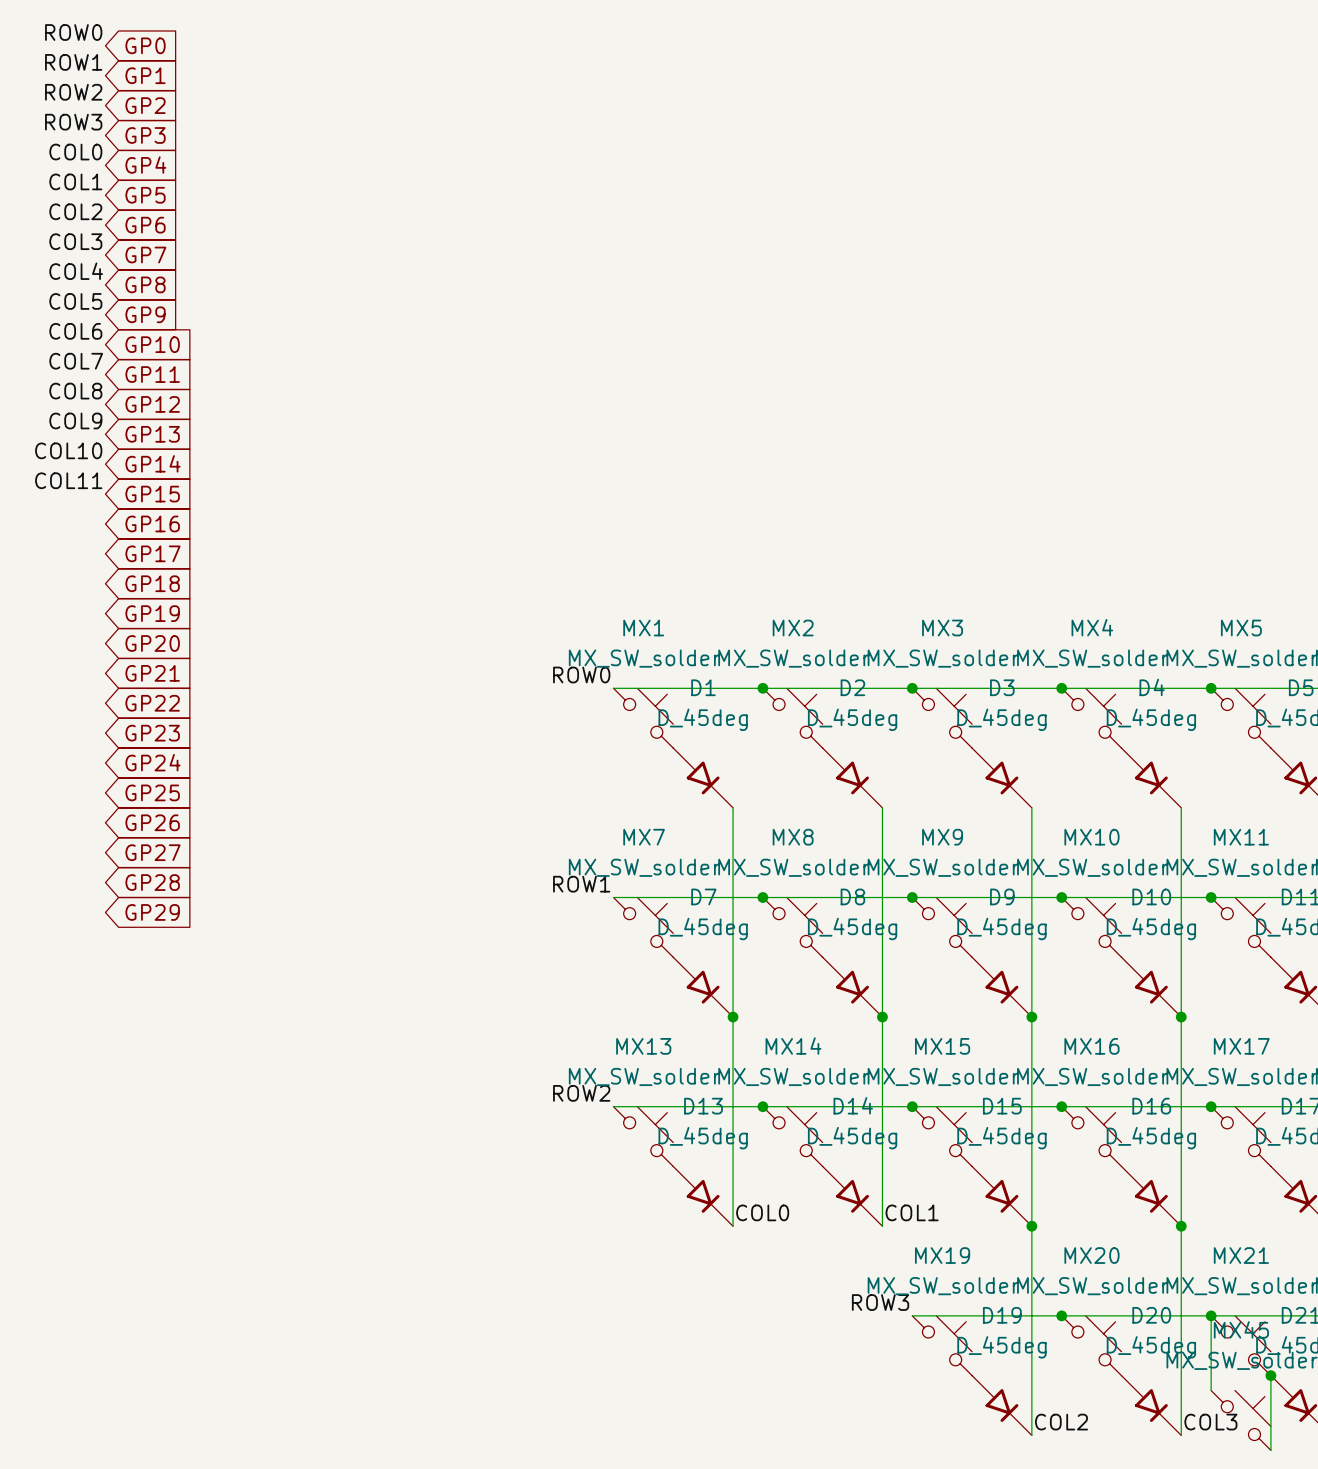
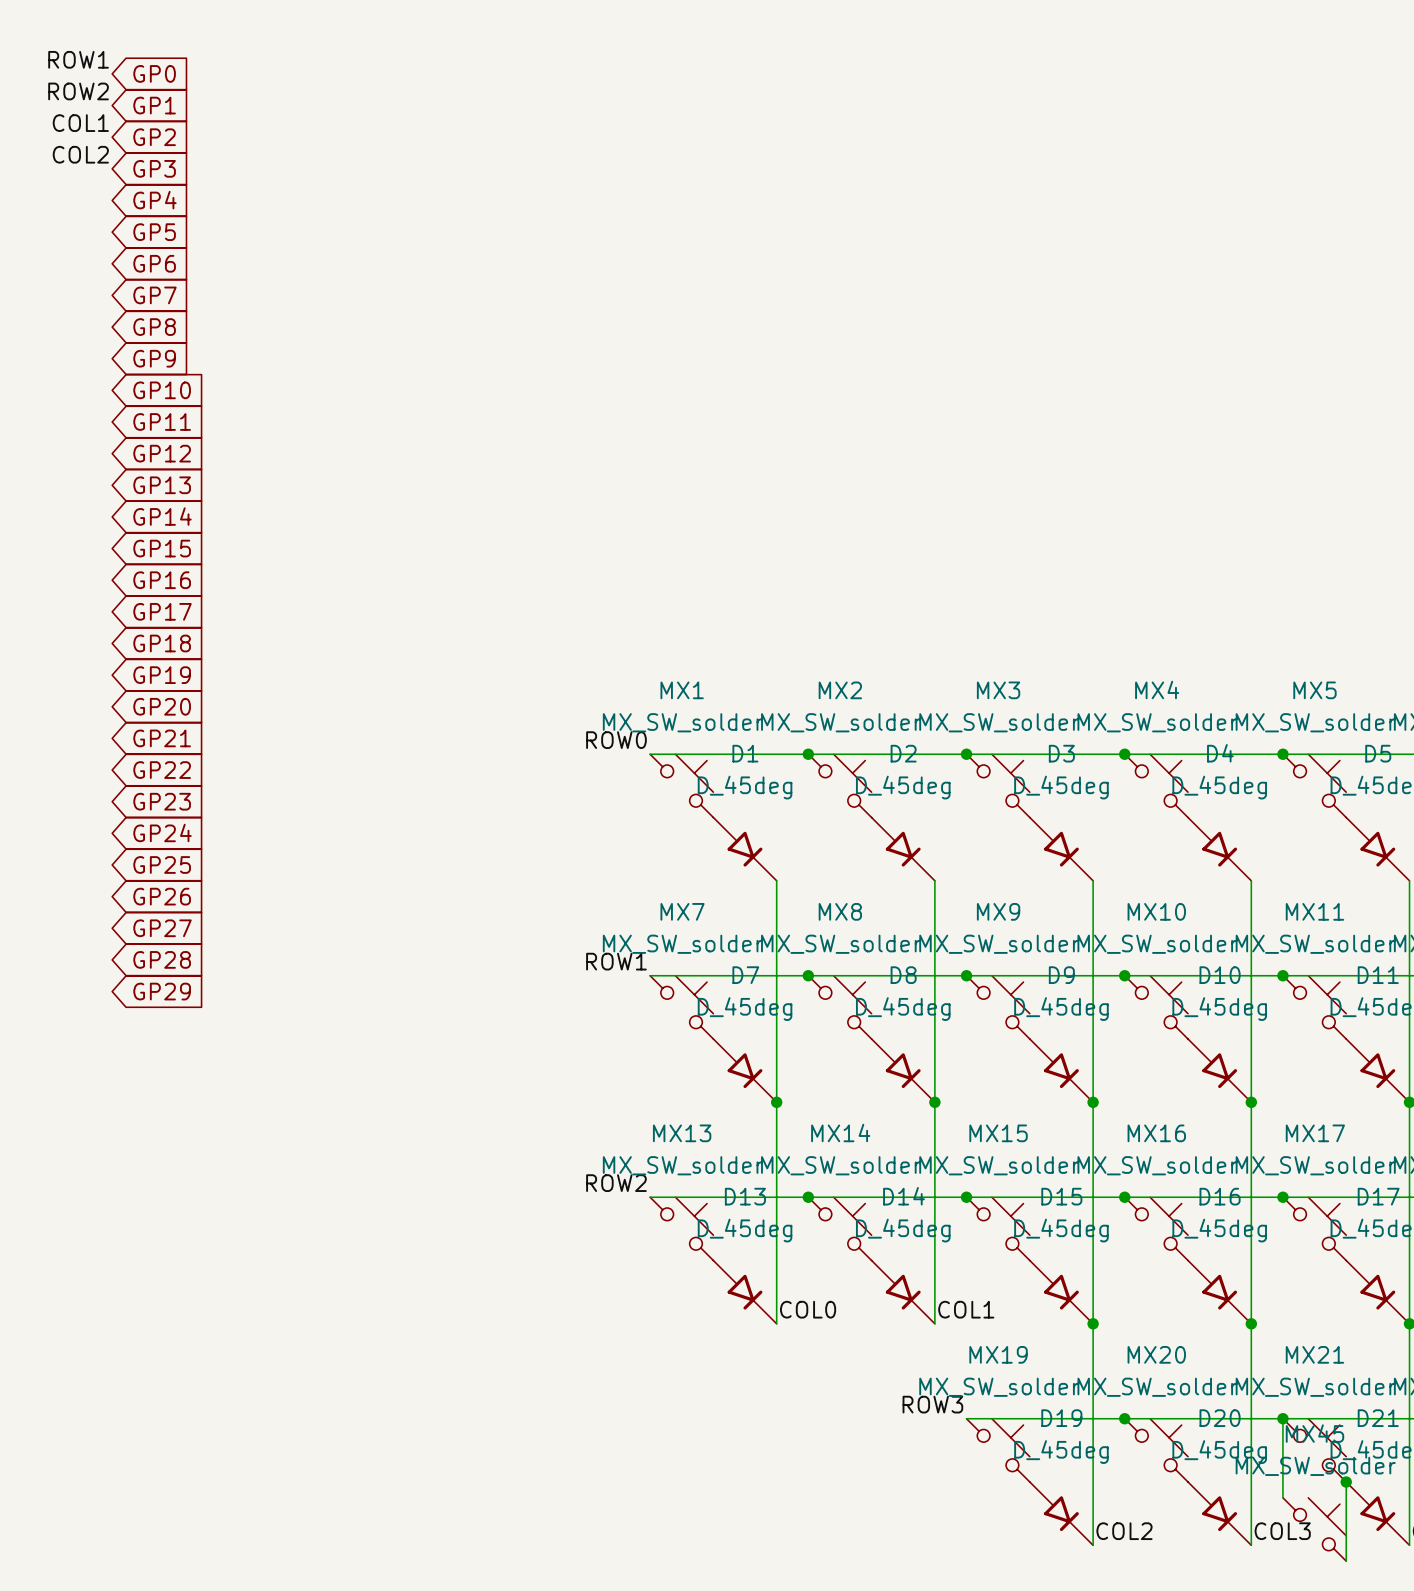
label: ROW0 (73, 32) -> ROW1 (78, 59)
label: ROW1 (73, 62) -> ROW2 (78, 91)
label: ROW2 (73, 92) -> COL1 (80, 123)
label: ROW3 (73, 122) -> COL2 (80, 154)
label: COL0 (75, 152) -> none
label: COL1 (75, 181) -> none
label: COL2 (75, 211) -> none
label: COL3 (75, 241) -> none
label: COL4 (76, 271) -> none
label: COL5 (75, 301) -> none
label: COL6 (75, 331) -> none
label: COL7 (76, 361) -> none
label: COL8 (75, 391) -> none
label: COL9 (75, 420) -> none
label: COL10 (68, 450) -> none
label: COL11 (68, 480) -> none

